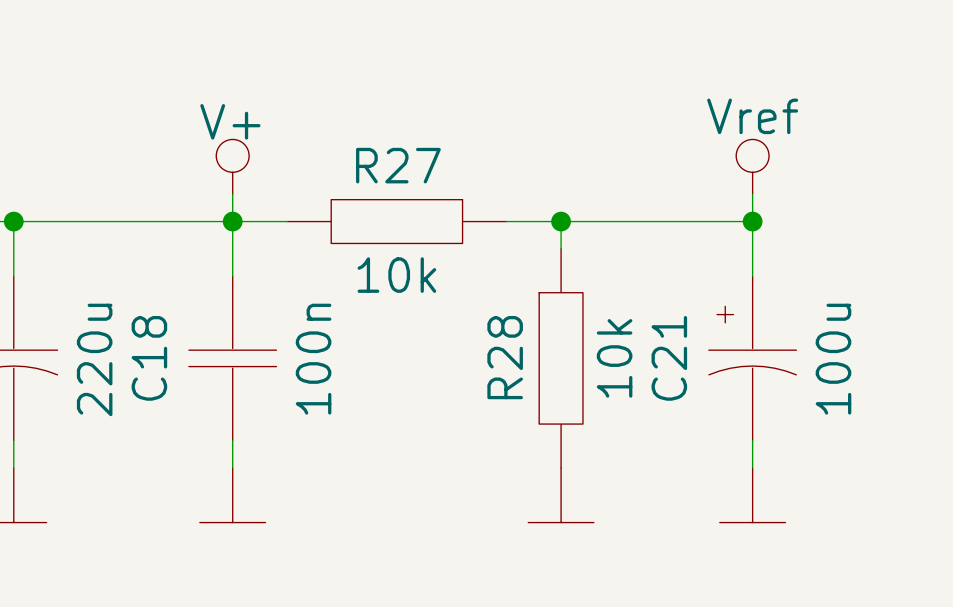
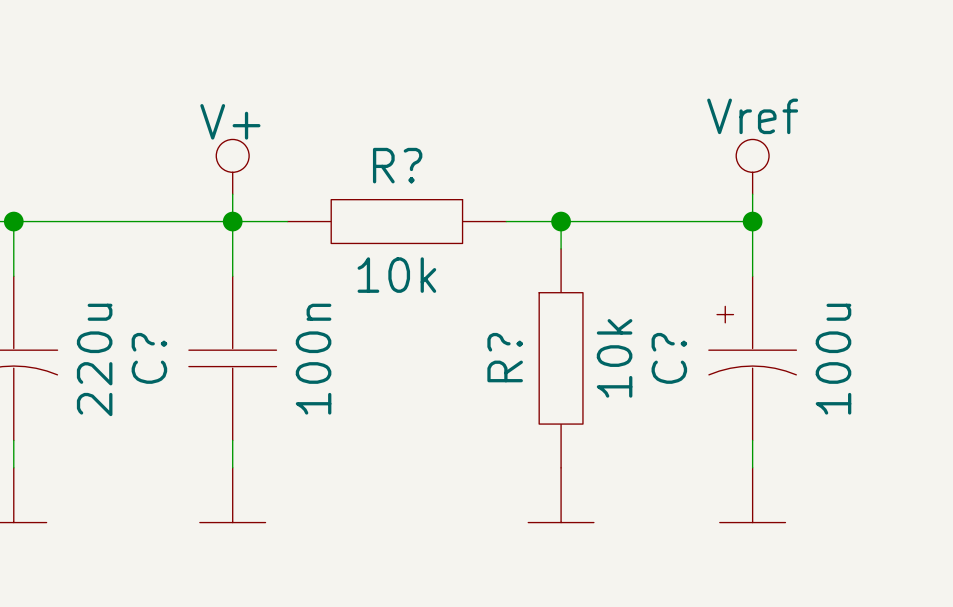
R27 name: R27 (398, 165) -> R? (397, 165)
R28 name: R28 (505, 357) -> R? (505, 357)
C18 name: C18 (149, 358) -> C? (149, 358)
C21 name: C21 (669, 358) -> C? (669, 358)

